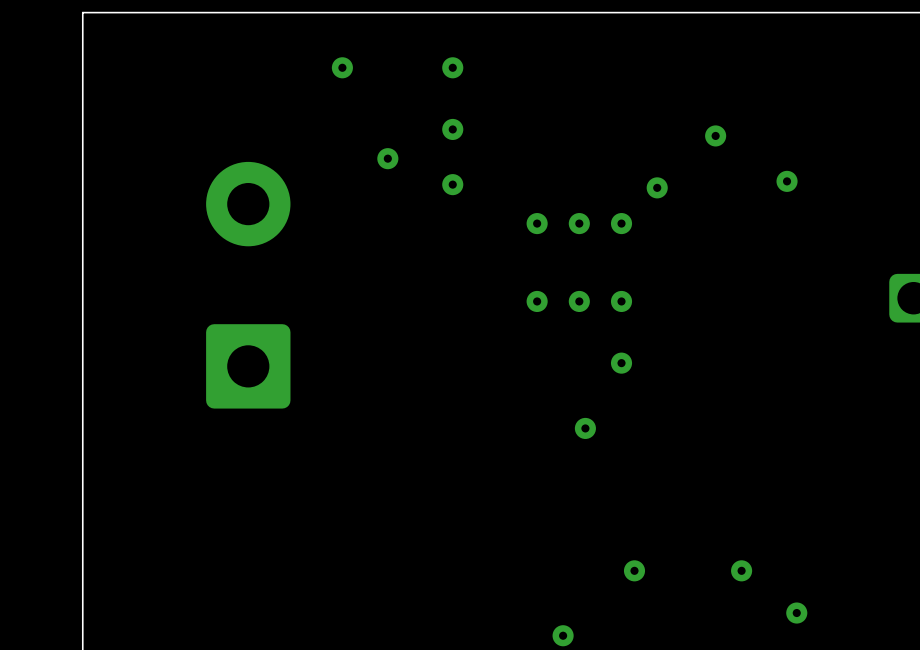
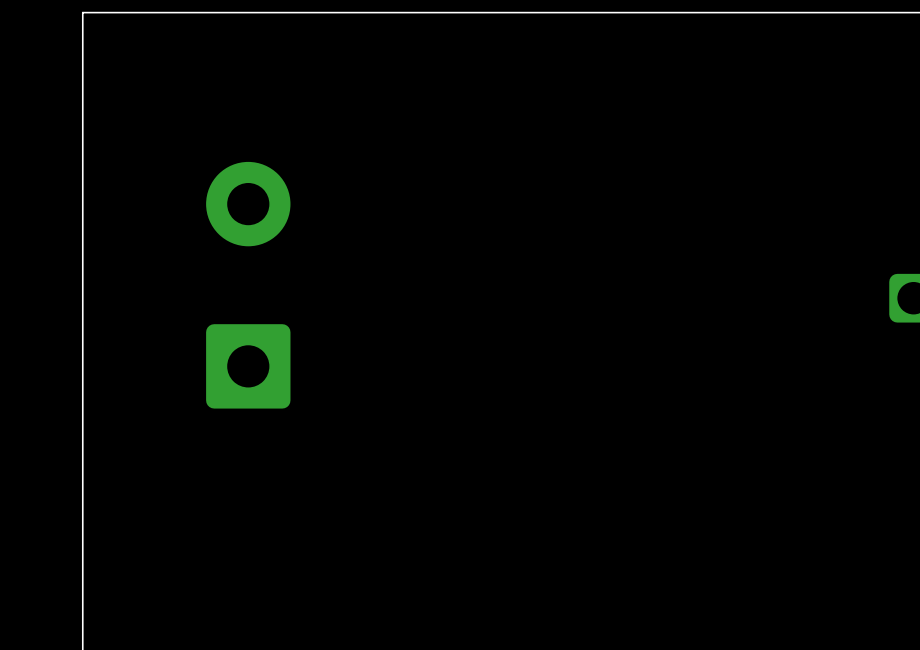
via: (342, 67) -> none
via: (452, 67) -> none
via: (452, 129) -> none
via: (715, 135) -> none
via: (387, 158) -> none
via: (787, 181) -> none
via: (452, 184) -> none
via: (657, 187) -> none
via: (537, 223) -> none
via: (579, 223) -> none
via: (621, 223) -> none
via: (537, 301) -> none
via: (579, 301) -> none
via: (621, 301) -> none
via: (621, 363) -> none
via: (585, 428) -> none
via: (634, 570) -> none
via: (741, 570) -> none
via: (796, 613) -> none
via: (563, 635) -> none

